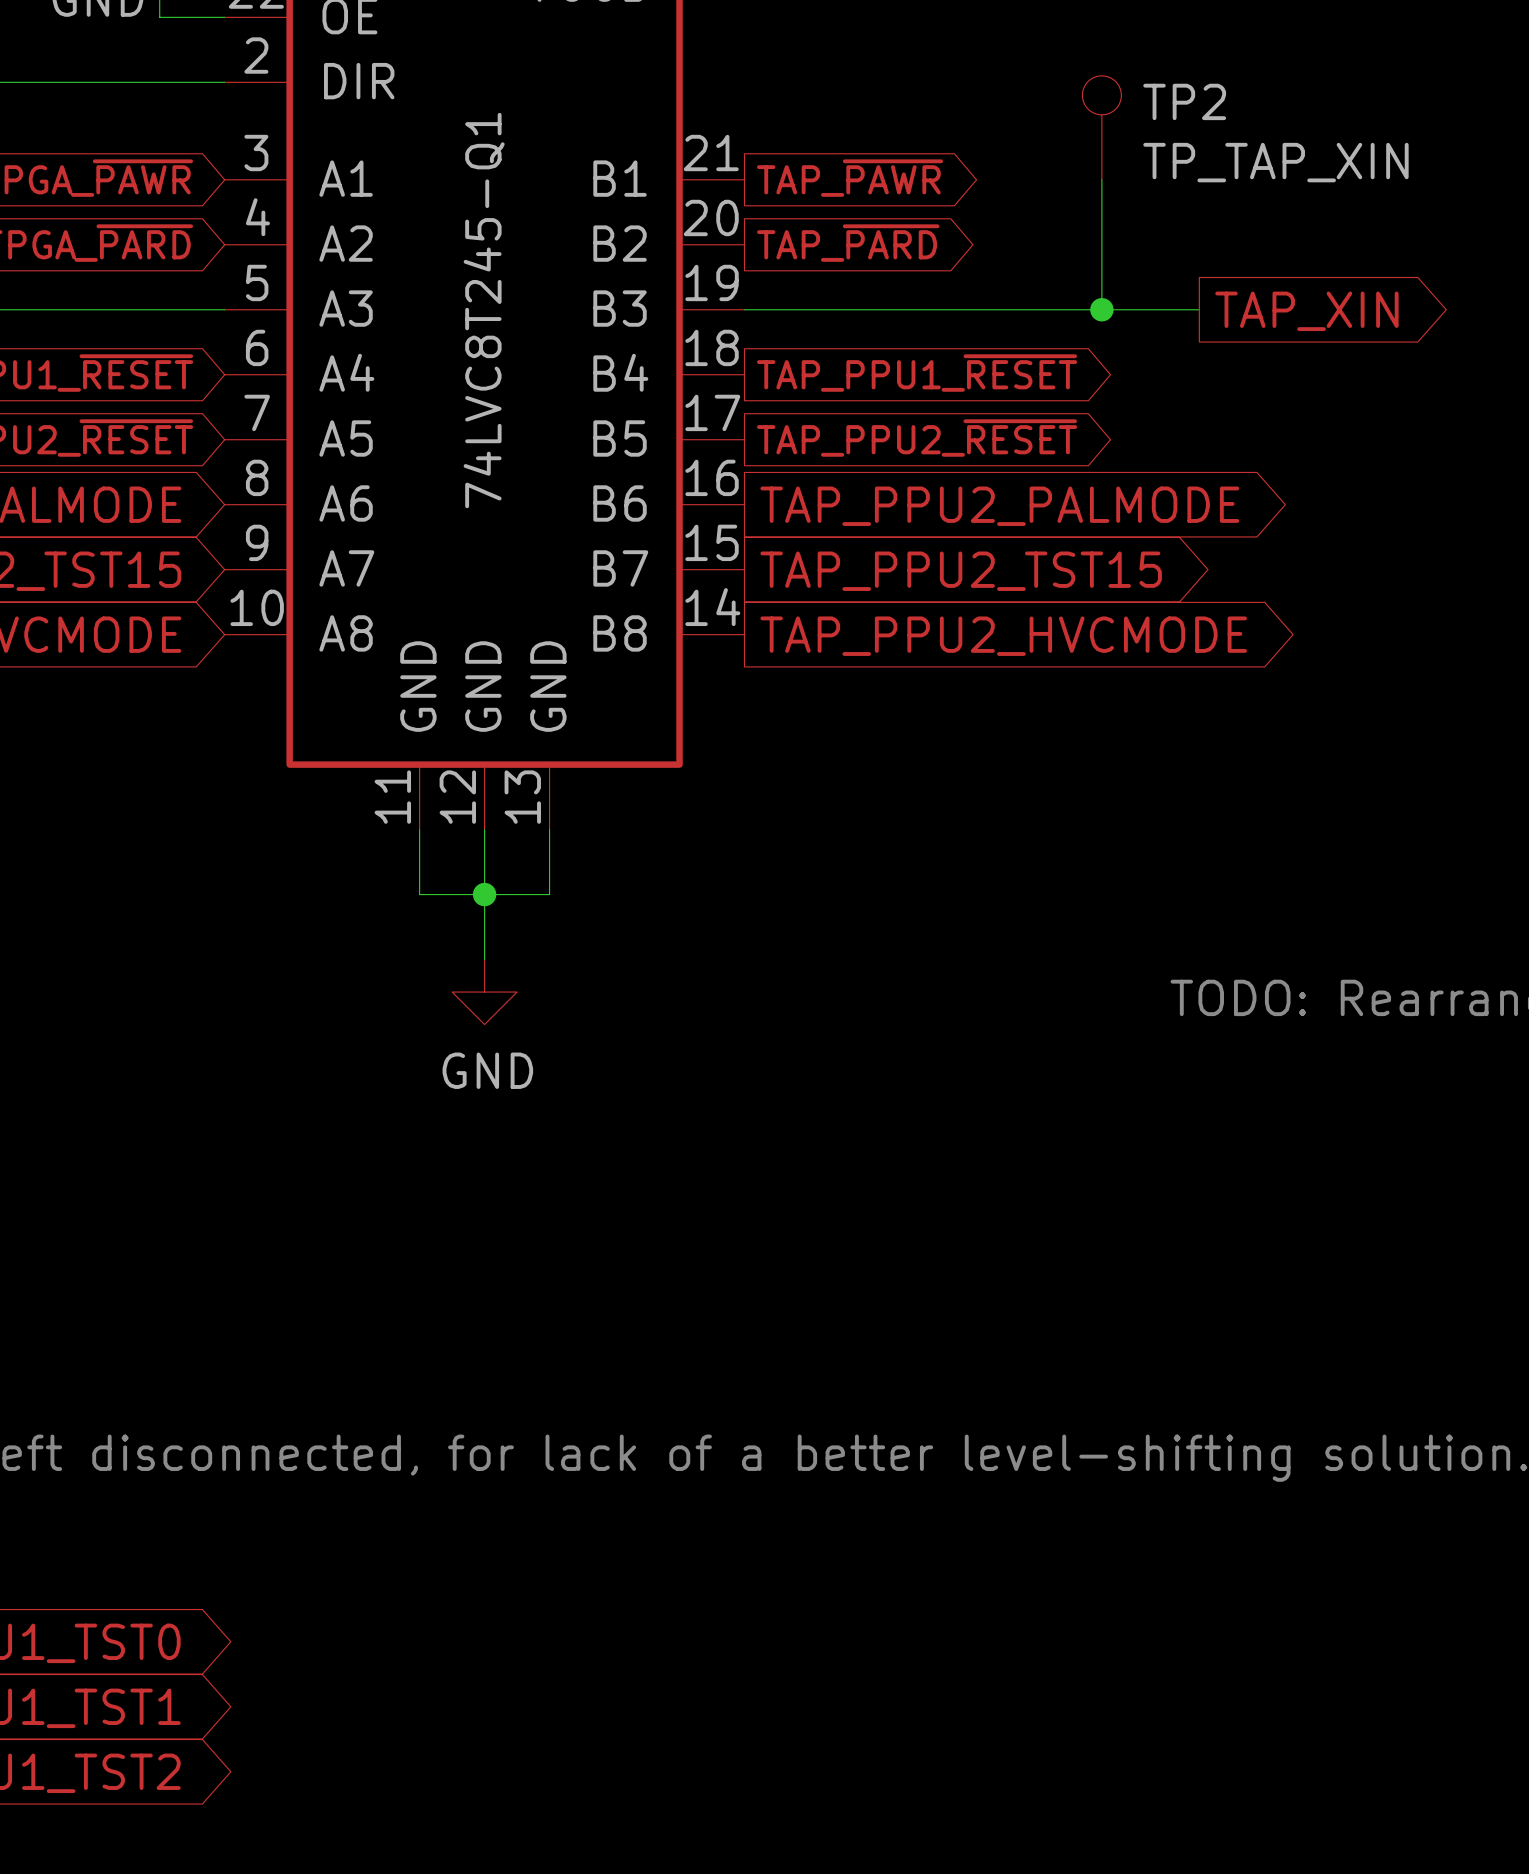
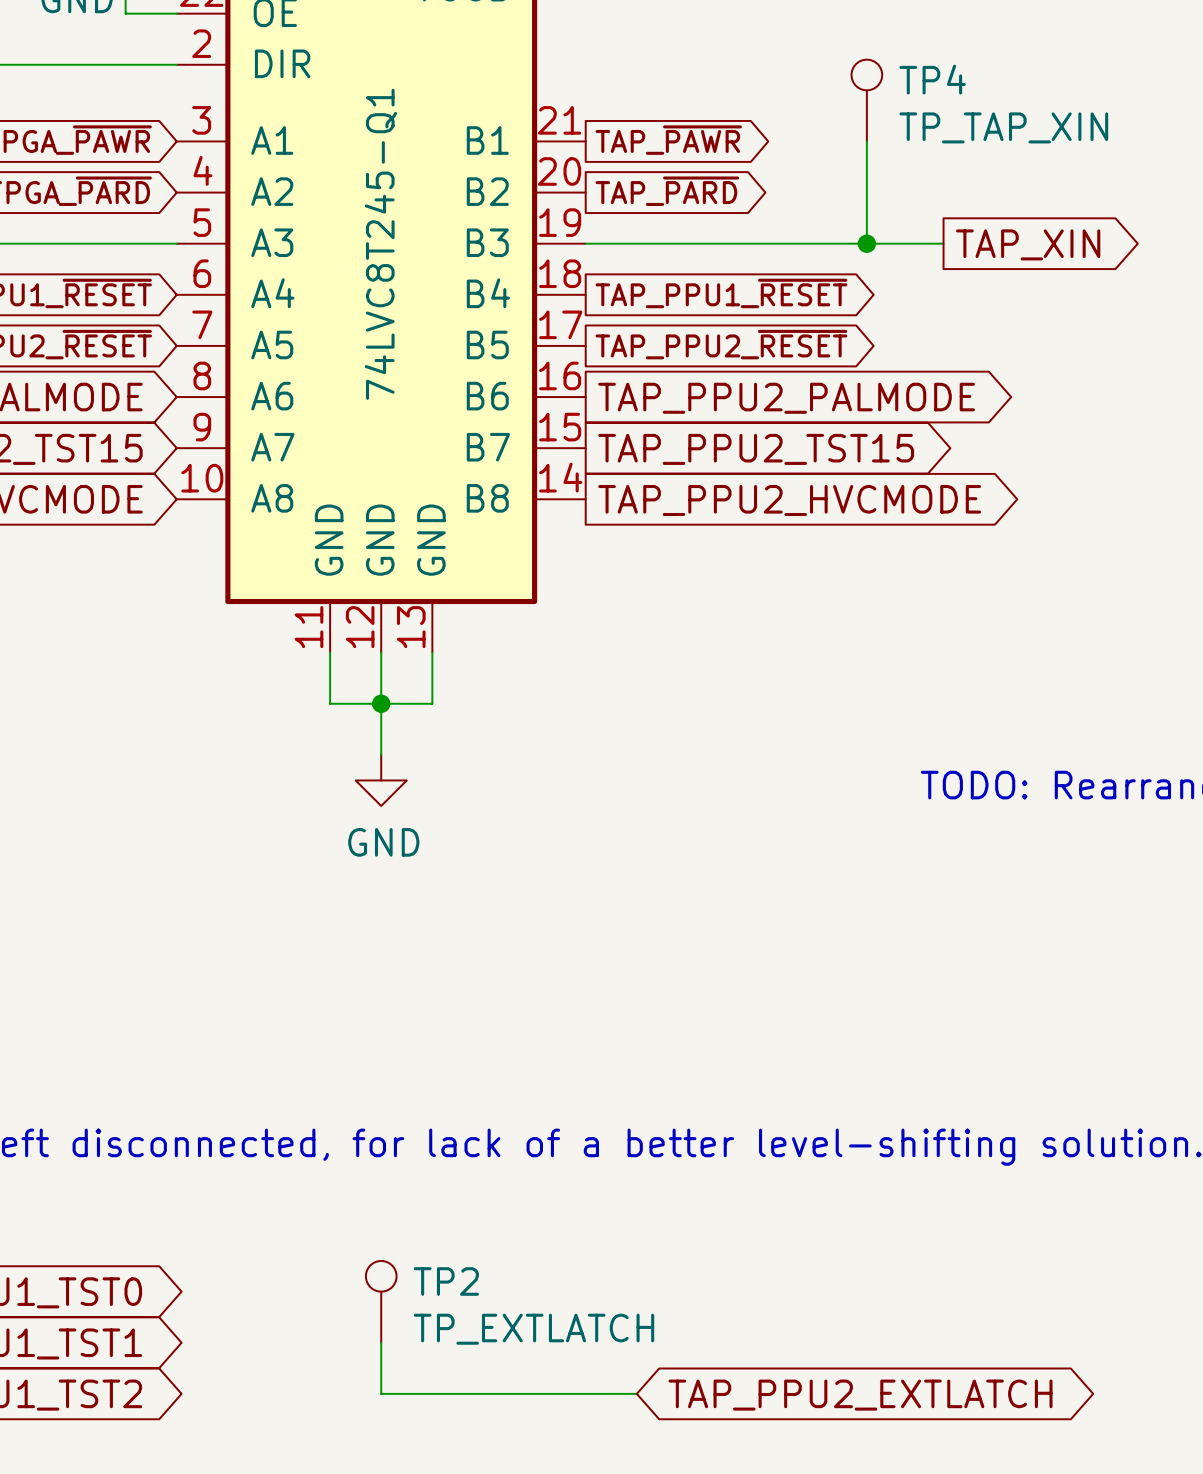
TP2 name: TP2 (1184, 101) -> TP4 (932, 79)
TP2: none -> TP_EXTLATCH (381, 1301)
wire: none -> (381, 1342) (381, 1393) (636, 1393)
global label: none -> TAP_PPU2_EXTLATCH (860, 1395)

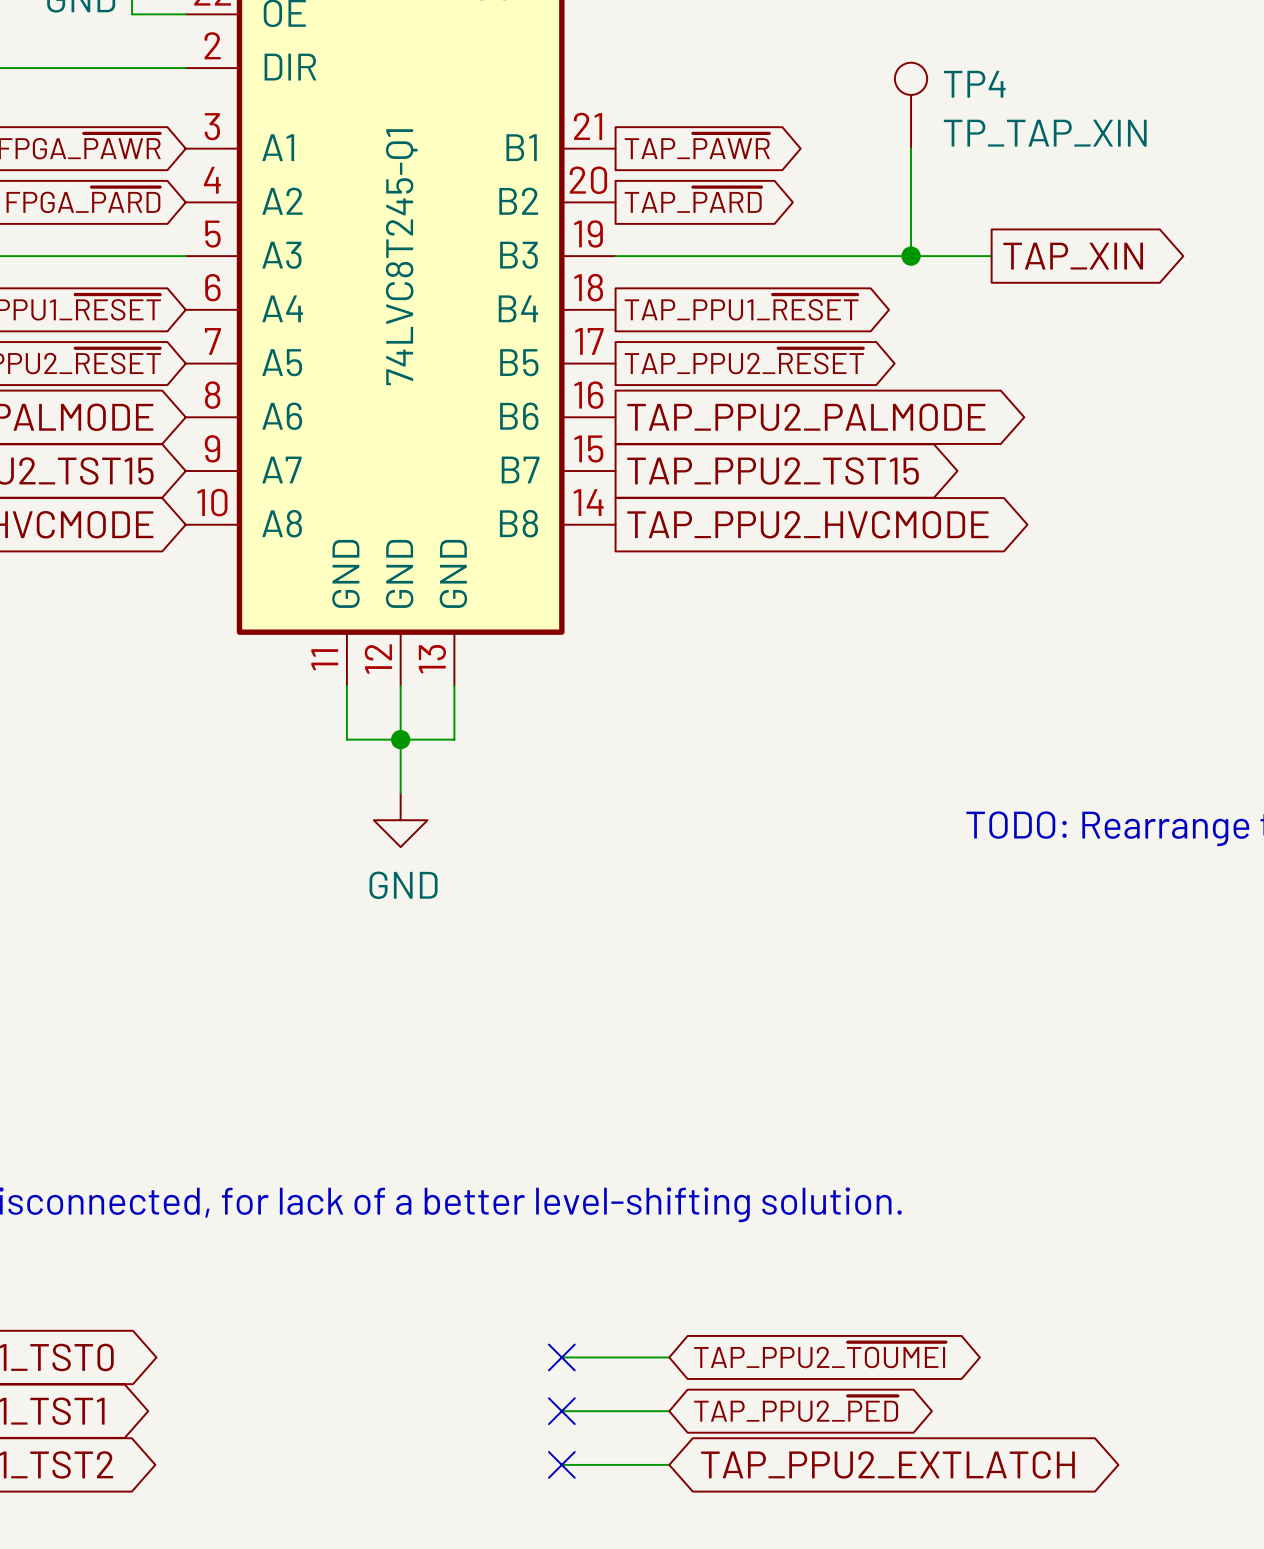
global label: none -> TAP_PPU2_~{TOUMEI} (820, 1355)
wire: none -> (561, 1357) (669, 1357)
no-connect mark: none -> (561, 1357)
TP2: TP_EXTLATCH (381, 1301) -> none
global label: none -> TAP_PPU2_~{PED} (796, 1408)
wire: (381, 1342) (381, 1393) (534, 1393) -> none
wire: none -> (561, 1411) (669, 1411)
no-connect mark: none -> (561, 1411)
no-connect mark: none -> (561, 1464)

